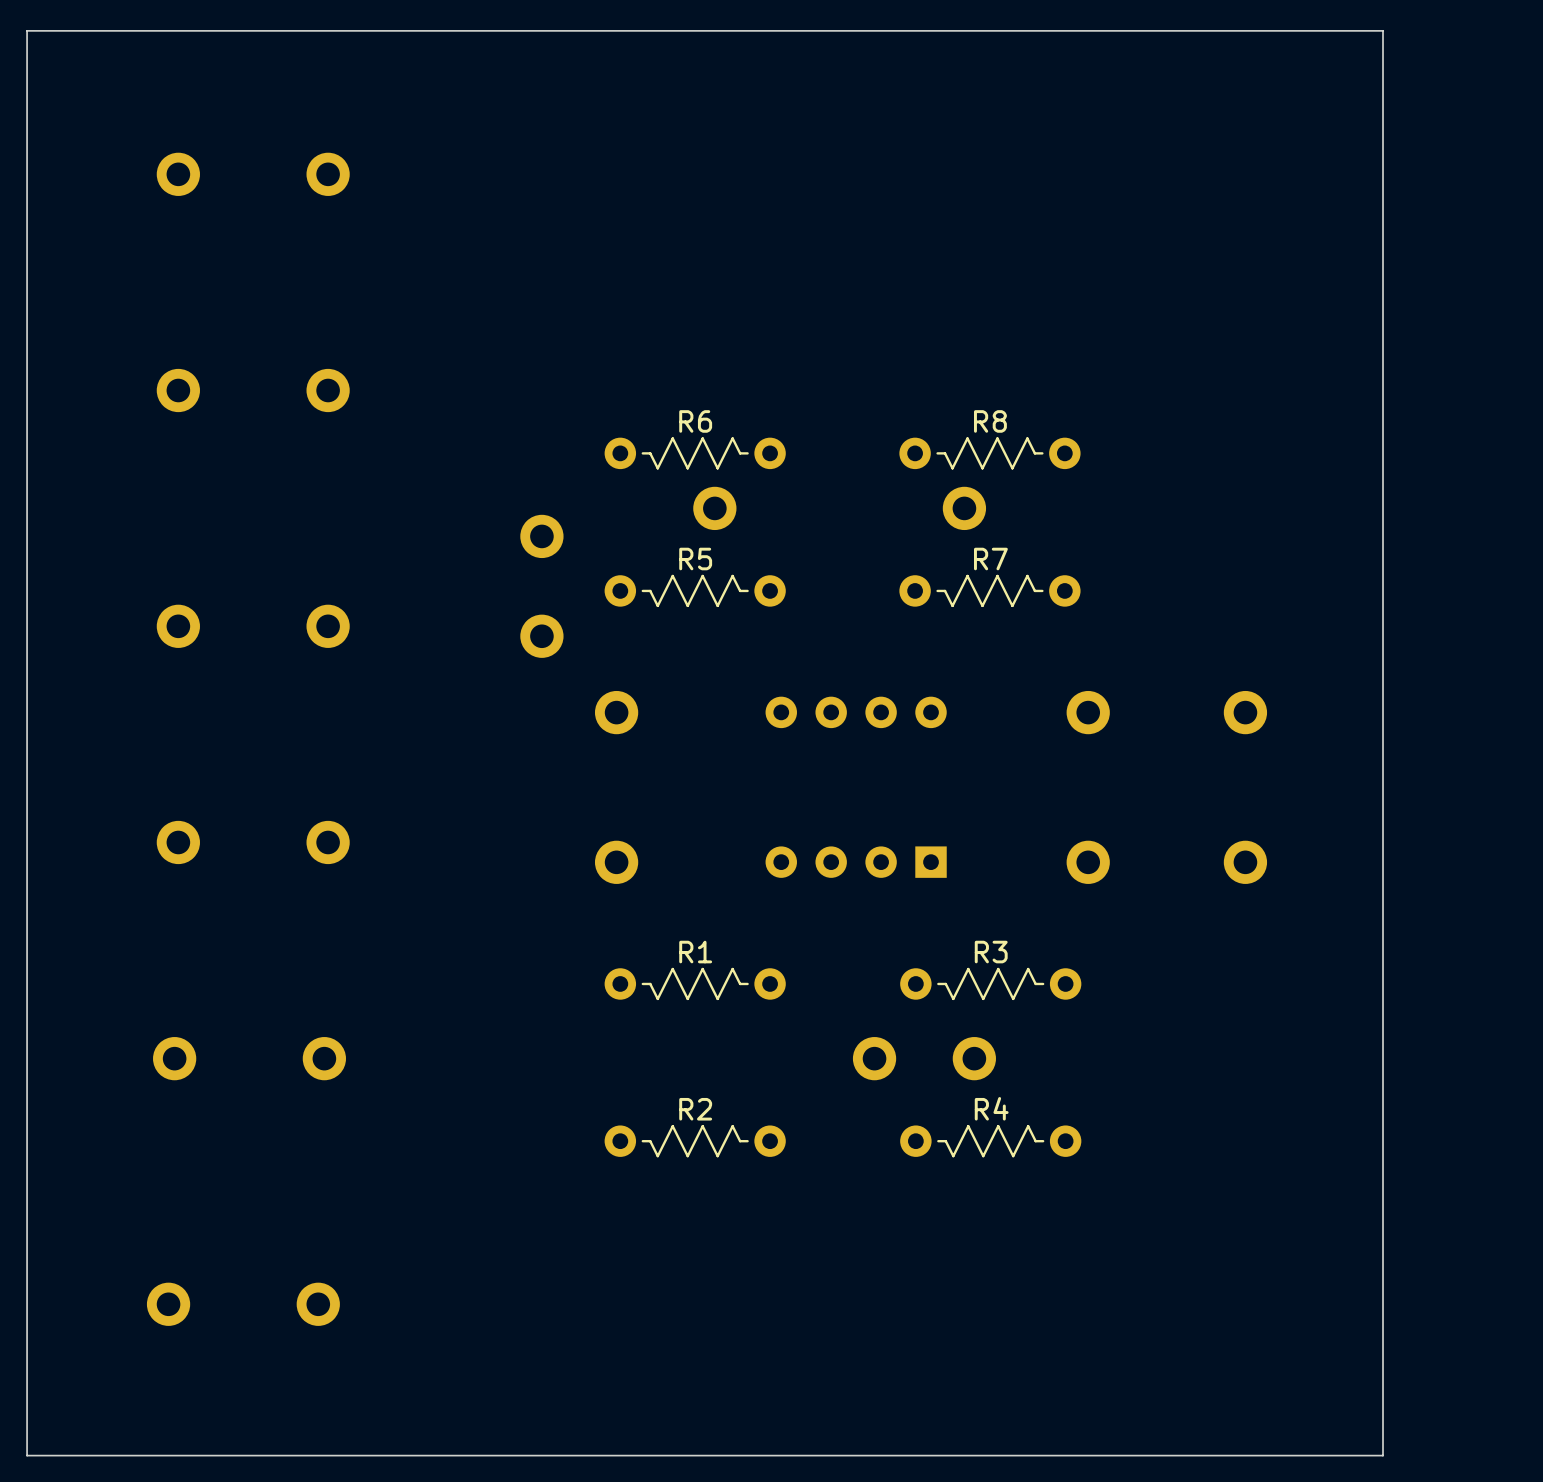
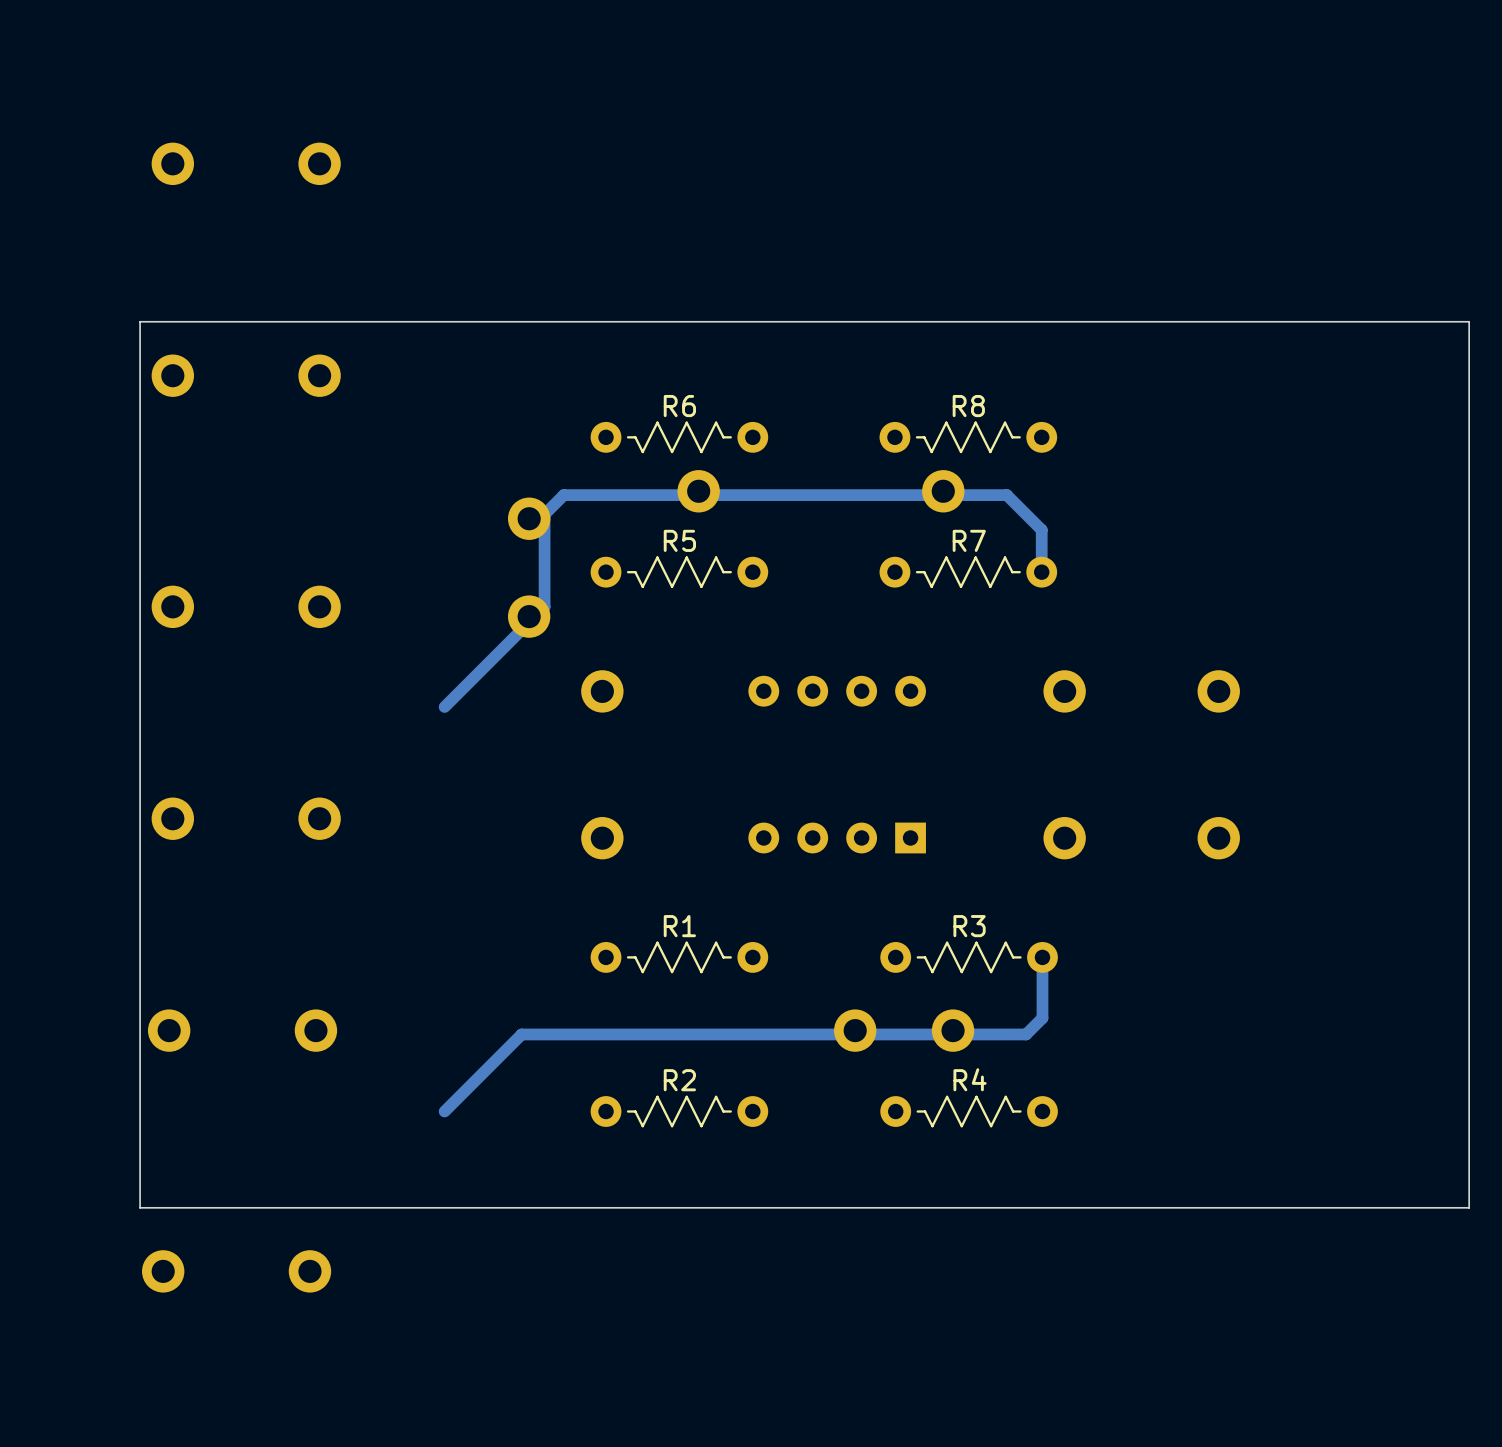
board edge: (1383, 30) (27, 30) (27, 1455) (1383, 1455) (1383, 30) -> (1469, 321) (1469, 1207) (140, 1207) (140, 321) (1469, 321)
track: none -> (1041, 572) (1041, 529) (1006, 495) (563, 495) (544, 514) (544, 607) (444, 707)
track: none -> (1042, 957) (1042, 1018) (1026, 1034) (521, 1034) (444, 1111)

